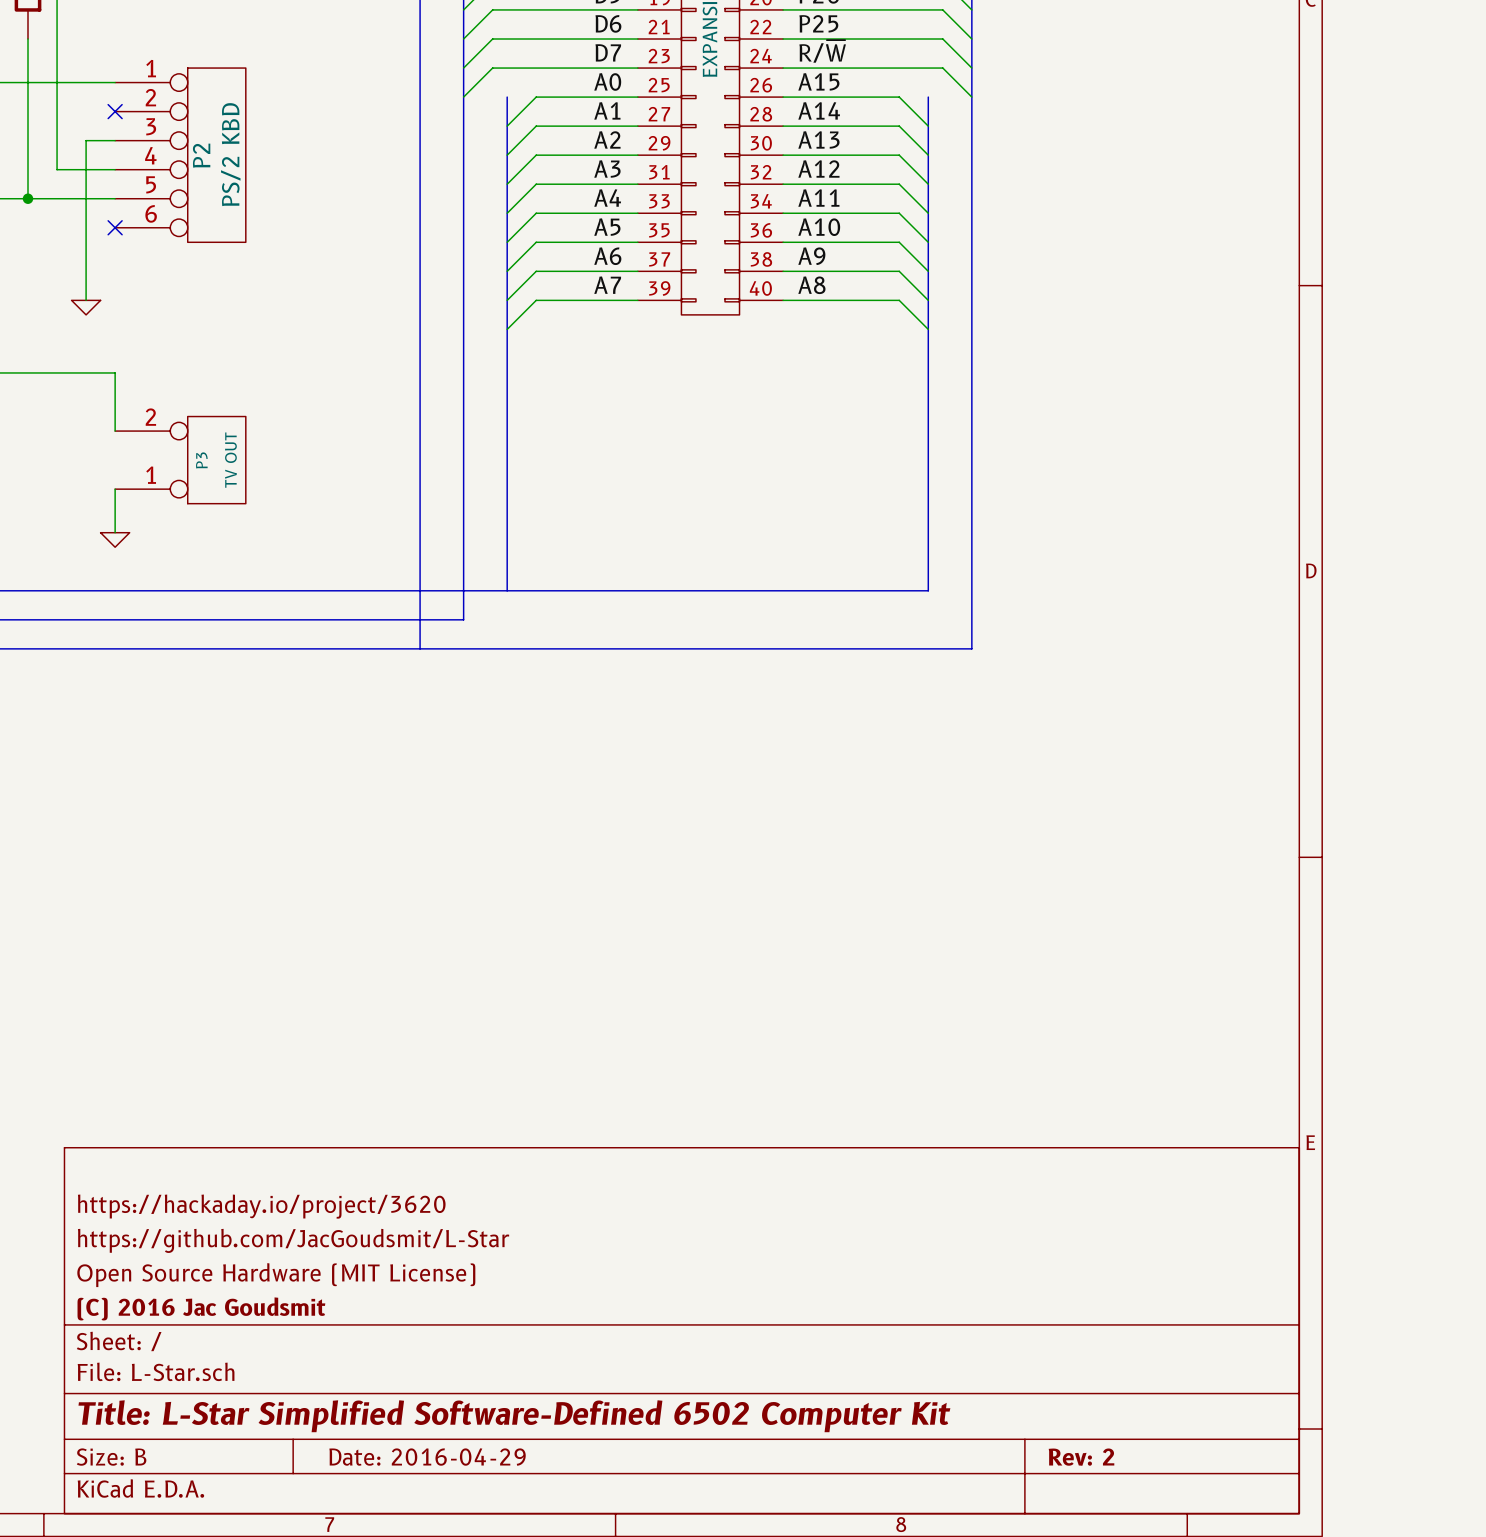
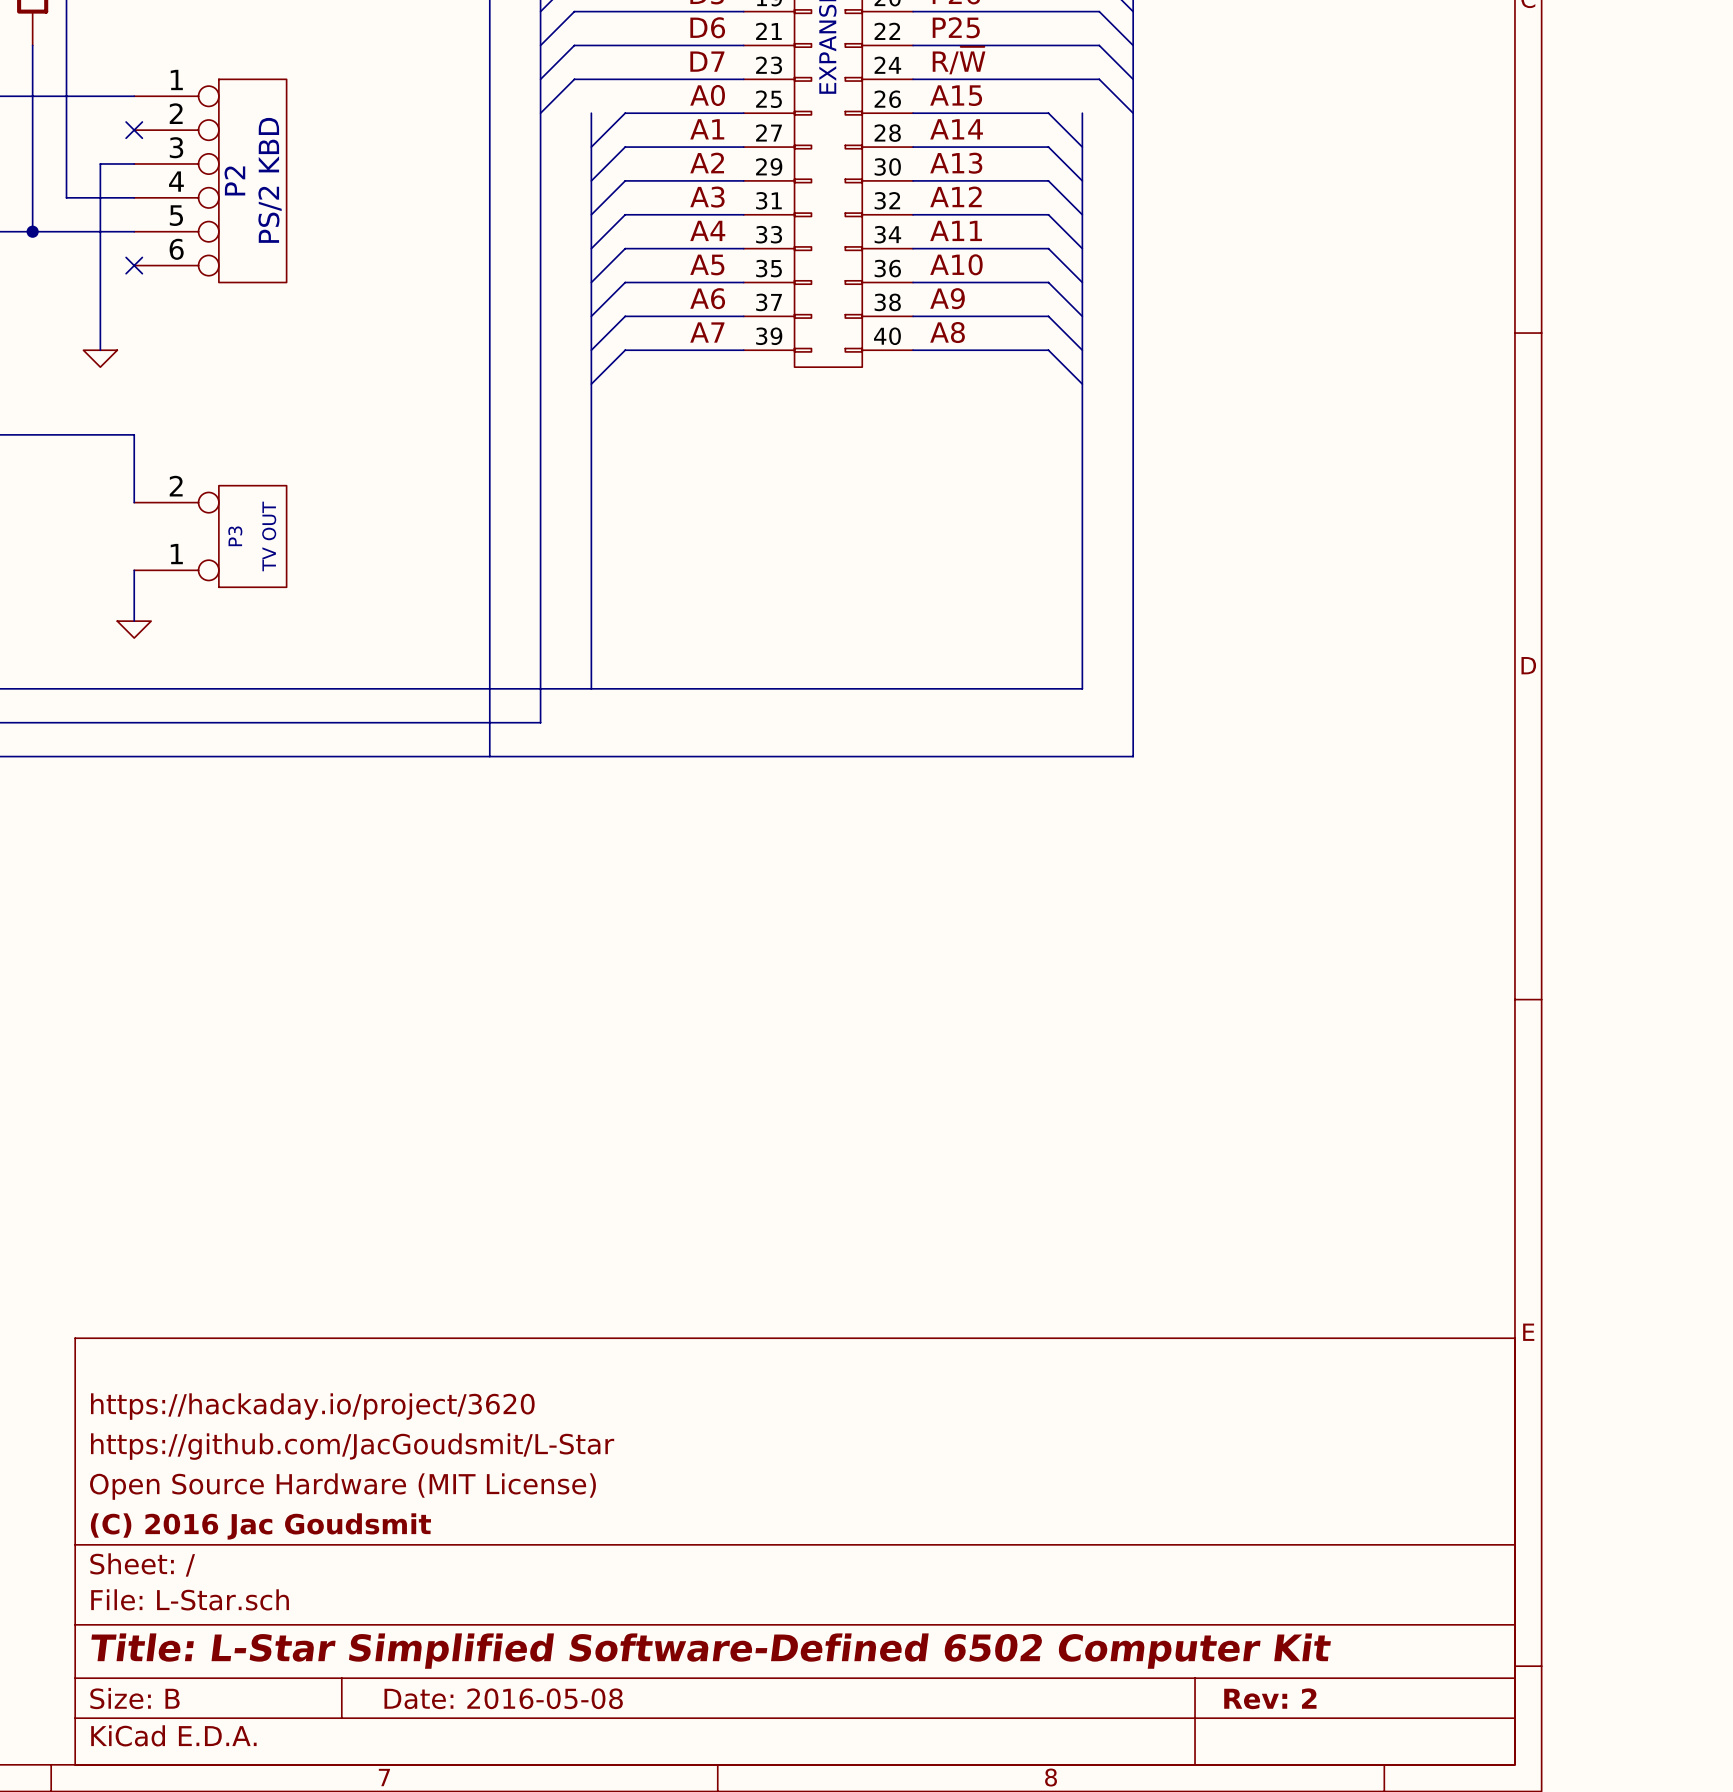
title block: Date: 2016-04-29 (427, 1457) -> Date: 2016-05-08 (503, 1698)

